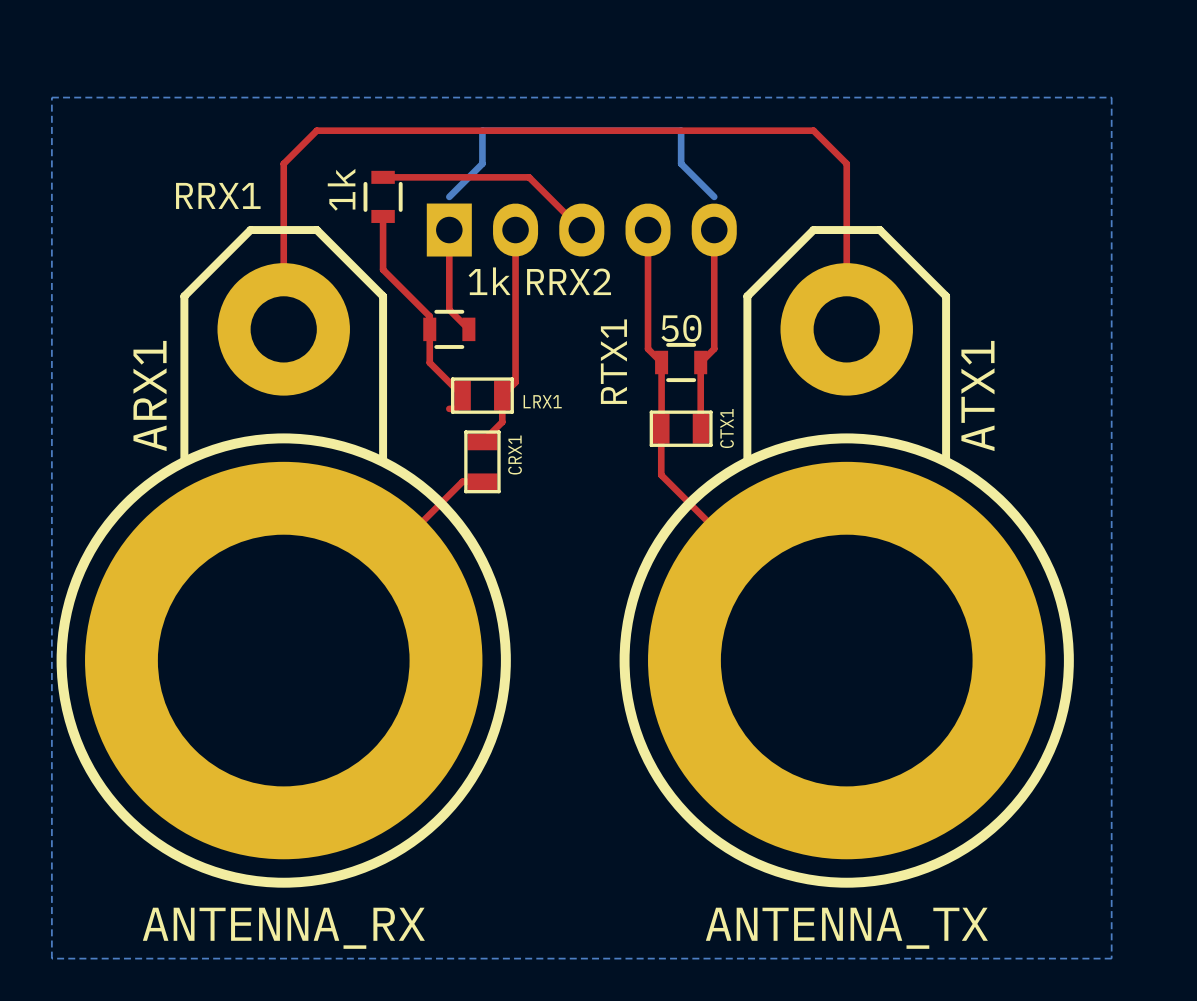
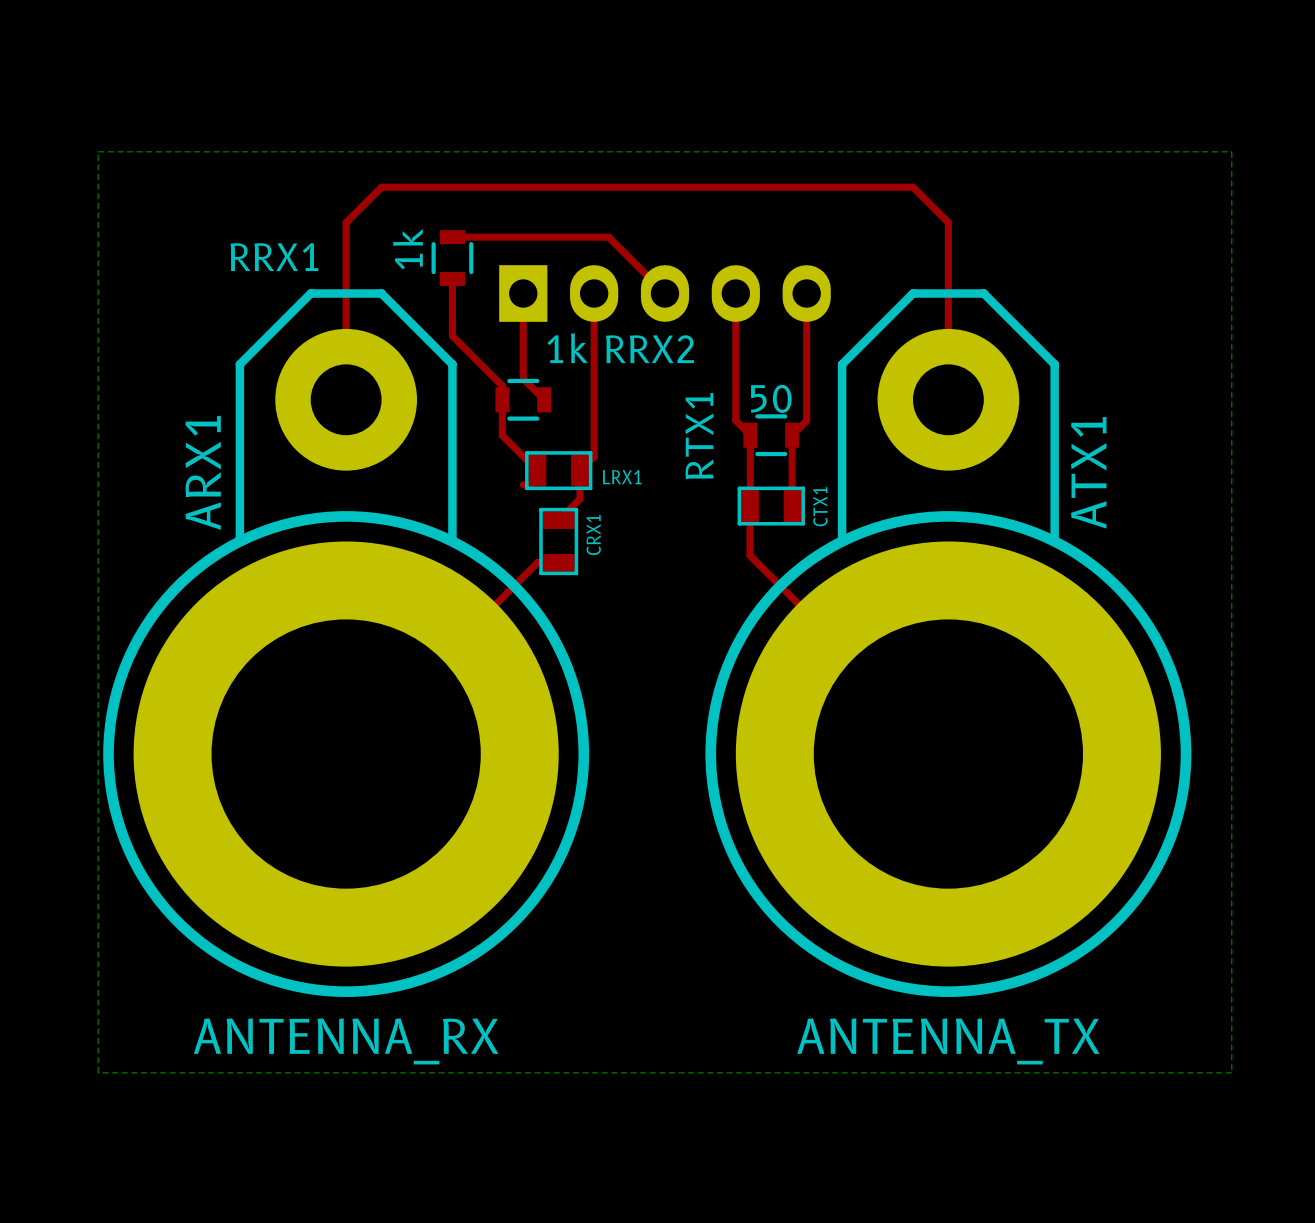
bottom track: (449, 196) (482, 163) (482, 130) (681, 130) (681, 163) (714, 196) -> none

